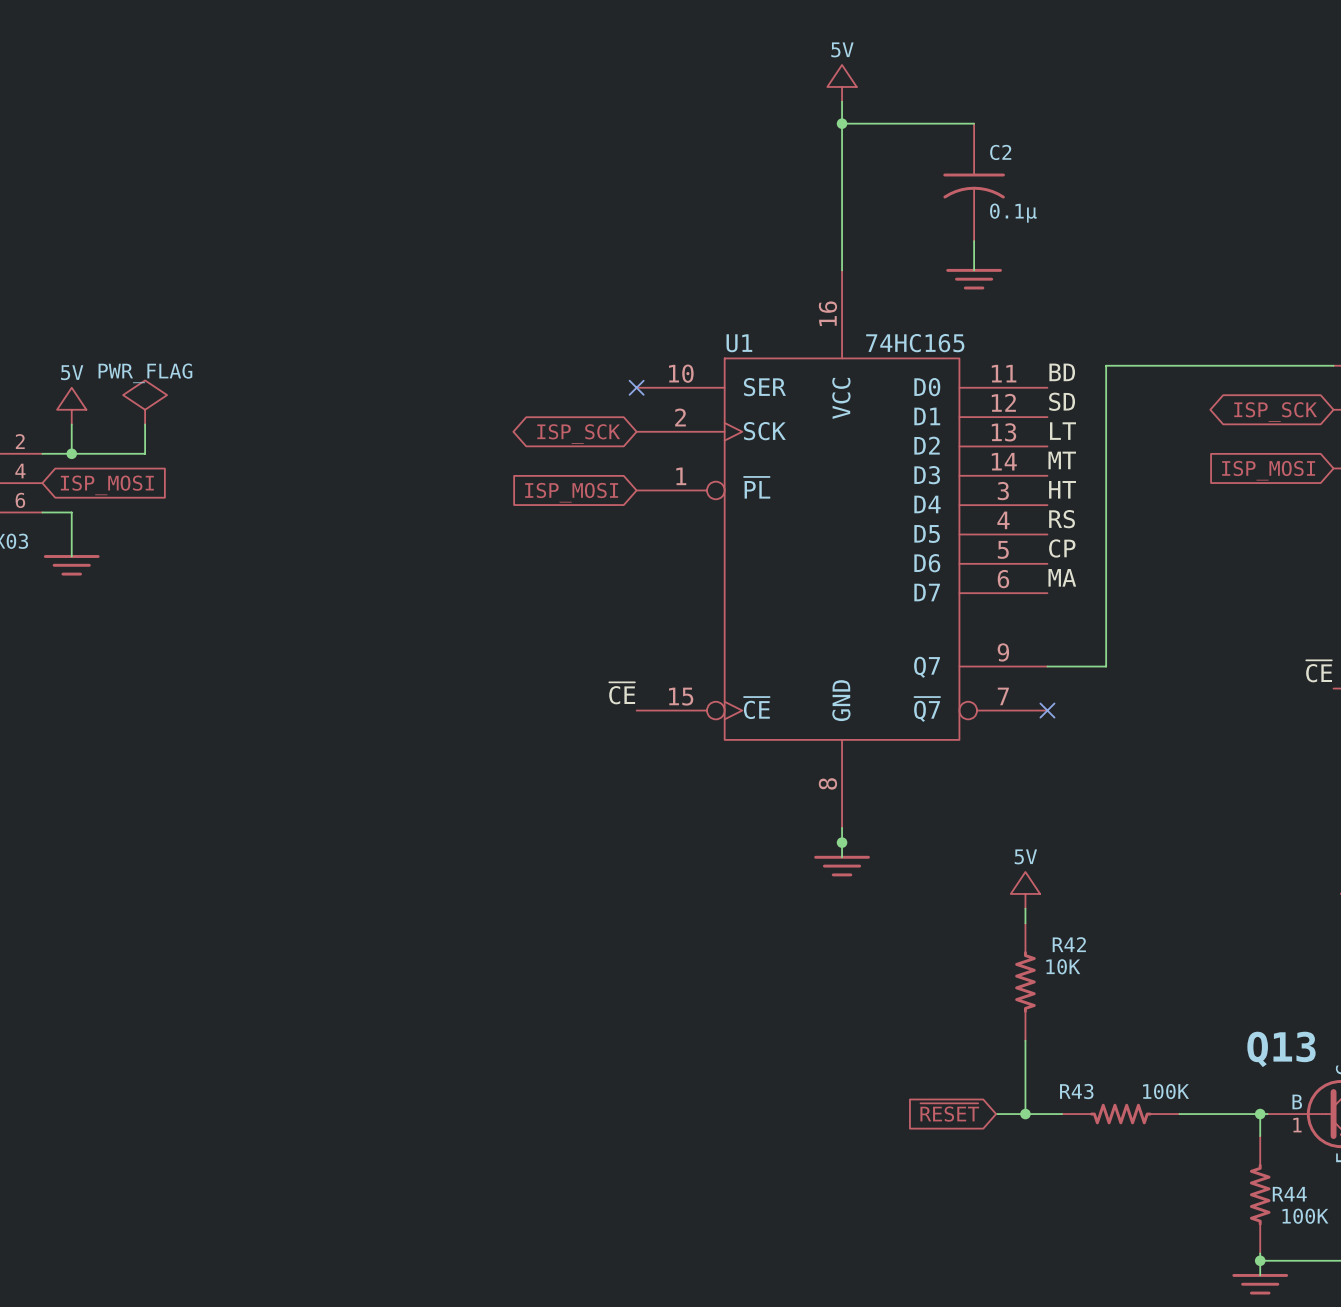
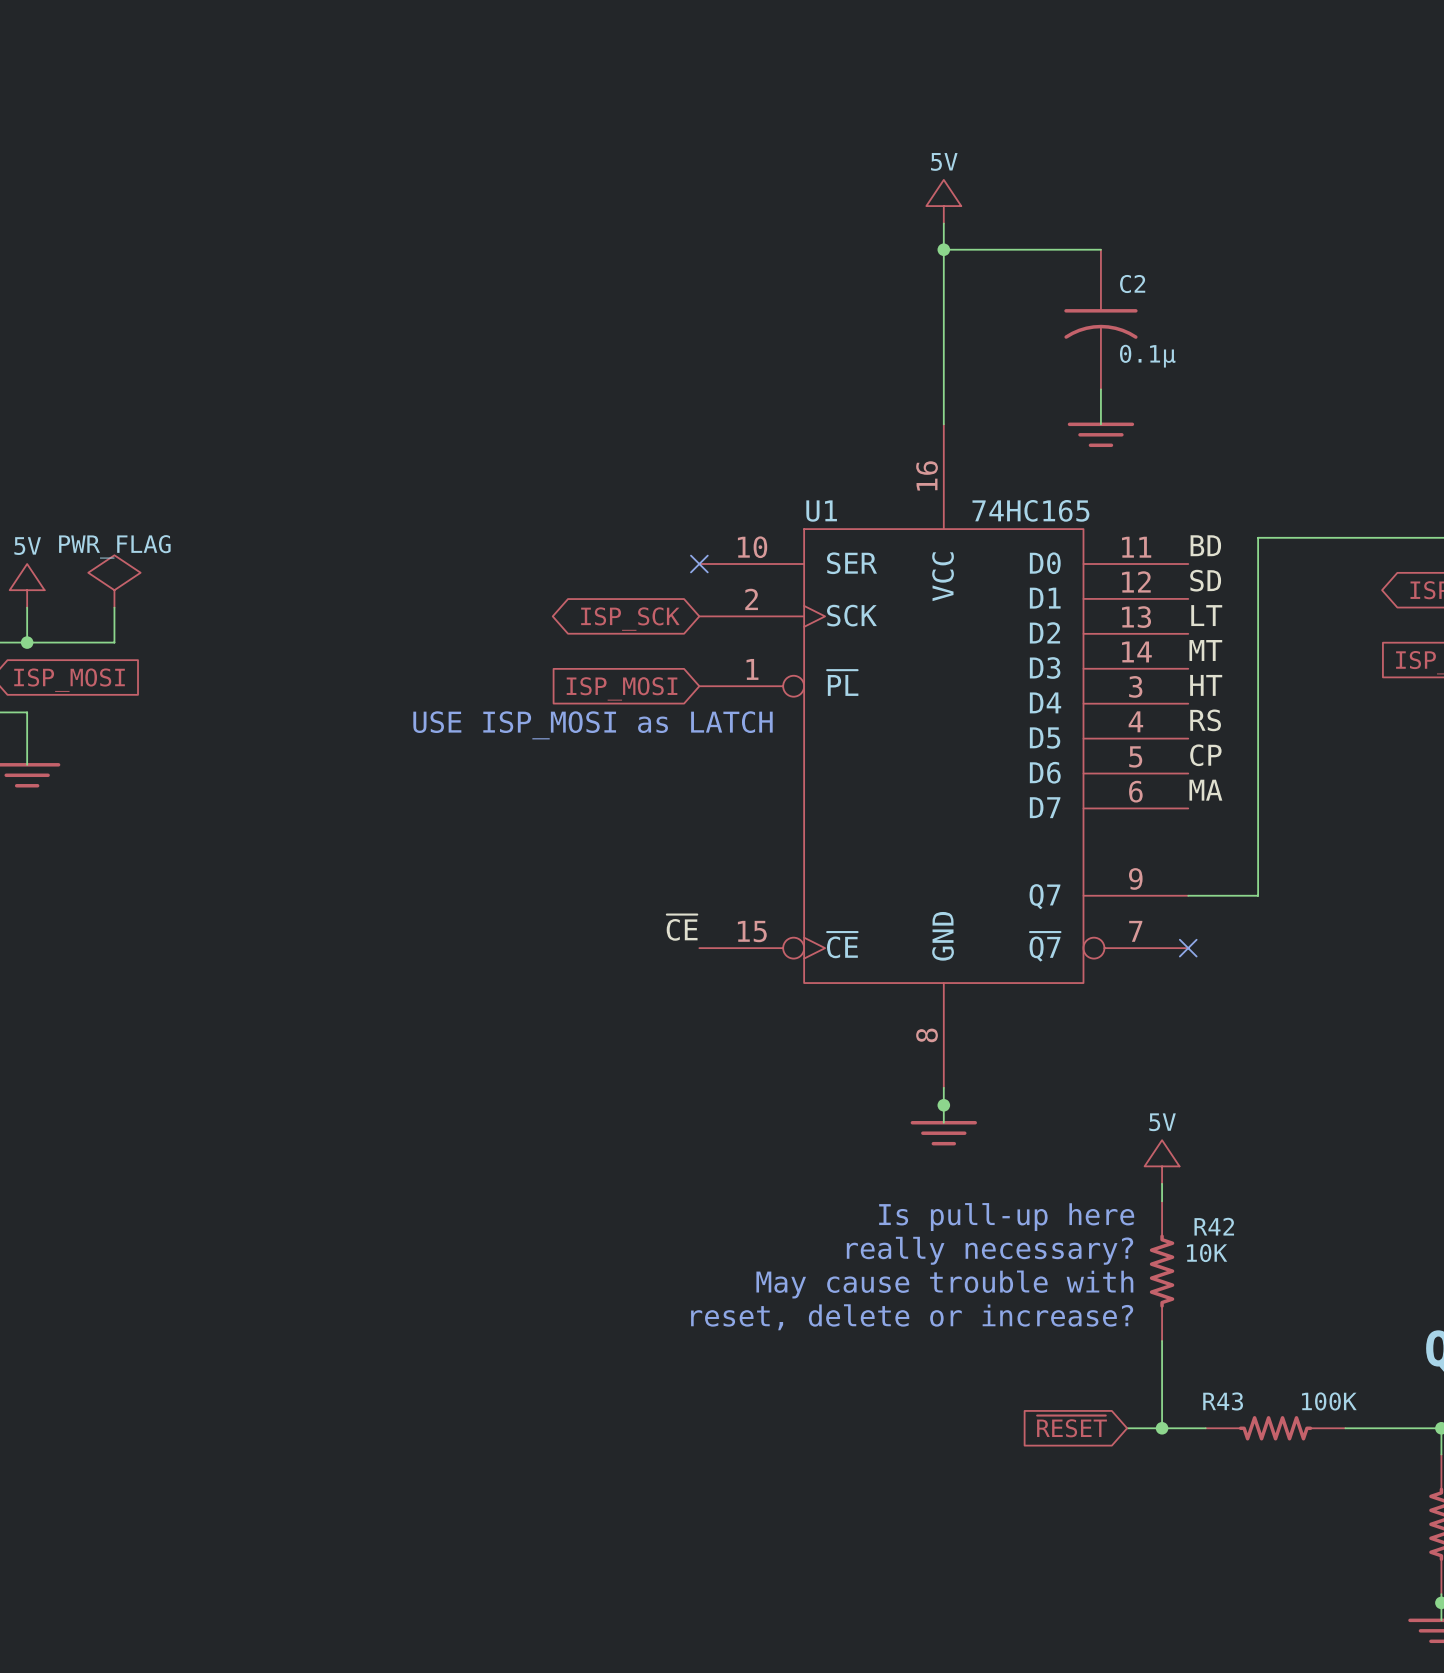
text: none -> USE ISP_MOSI as LATCH (593, 725)
text: none -> Is pull-up here (1006, 1217)
text: none -> really necessary? (989, 1250)
text: none -> May cause trouble with (944, 1284)
text: none -> reset, delete or increase? (912, 1317)

